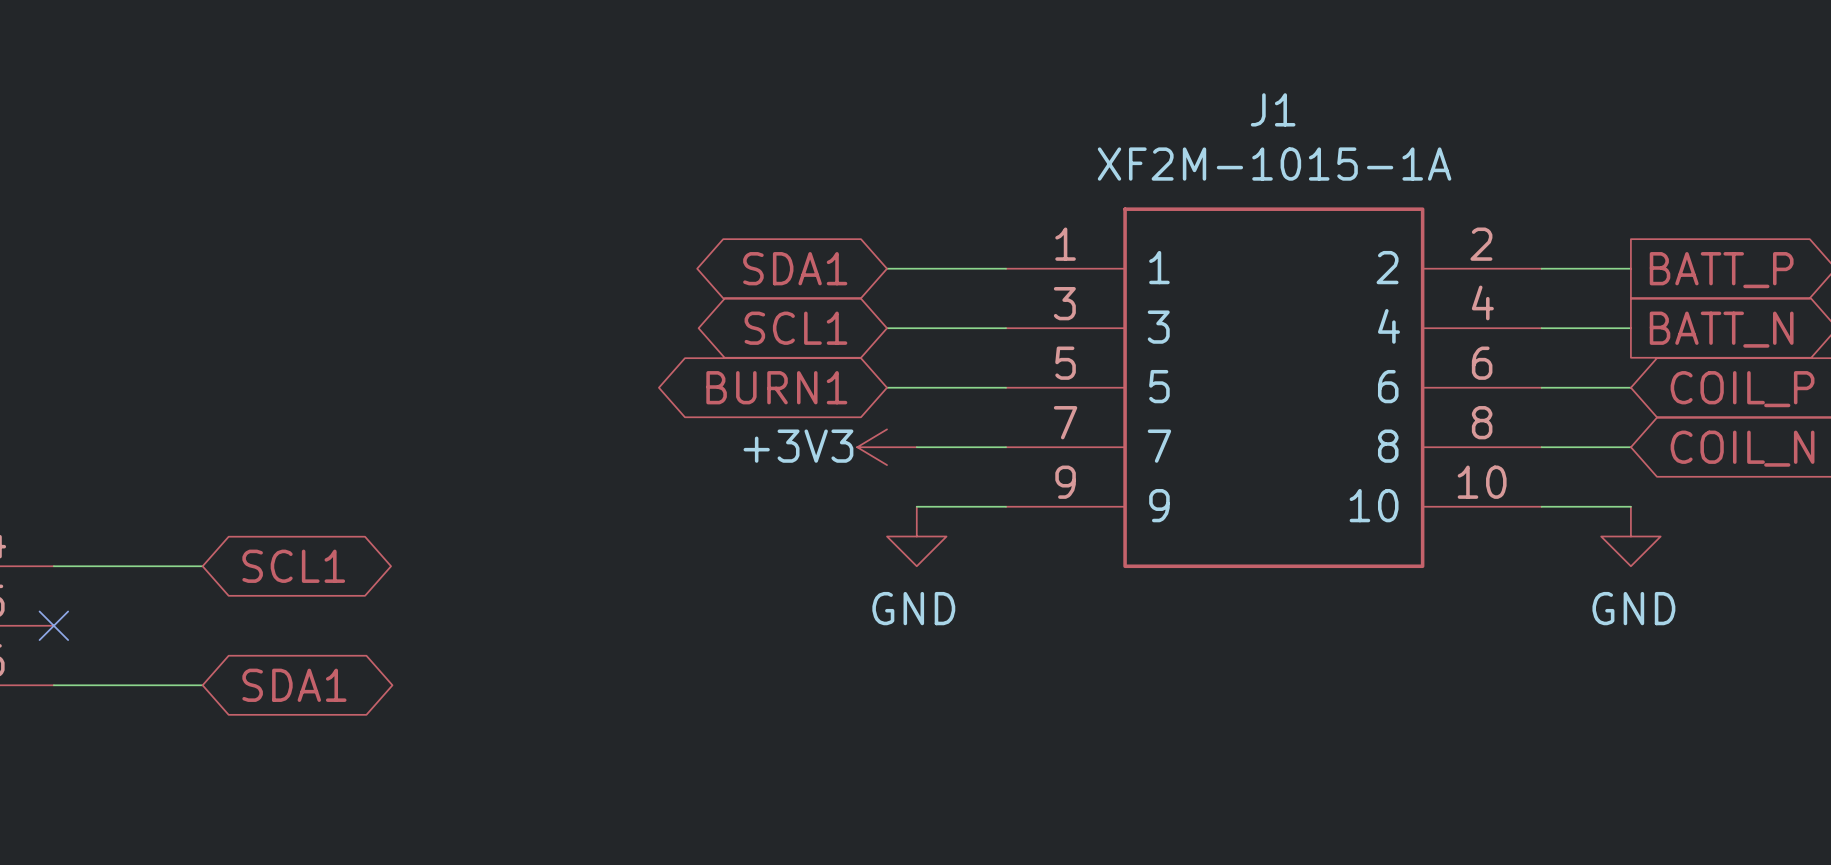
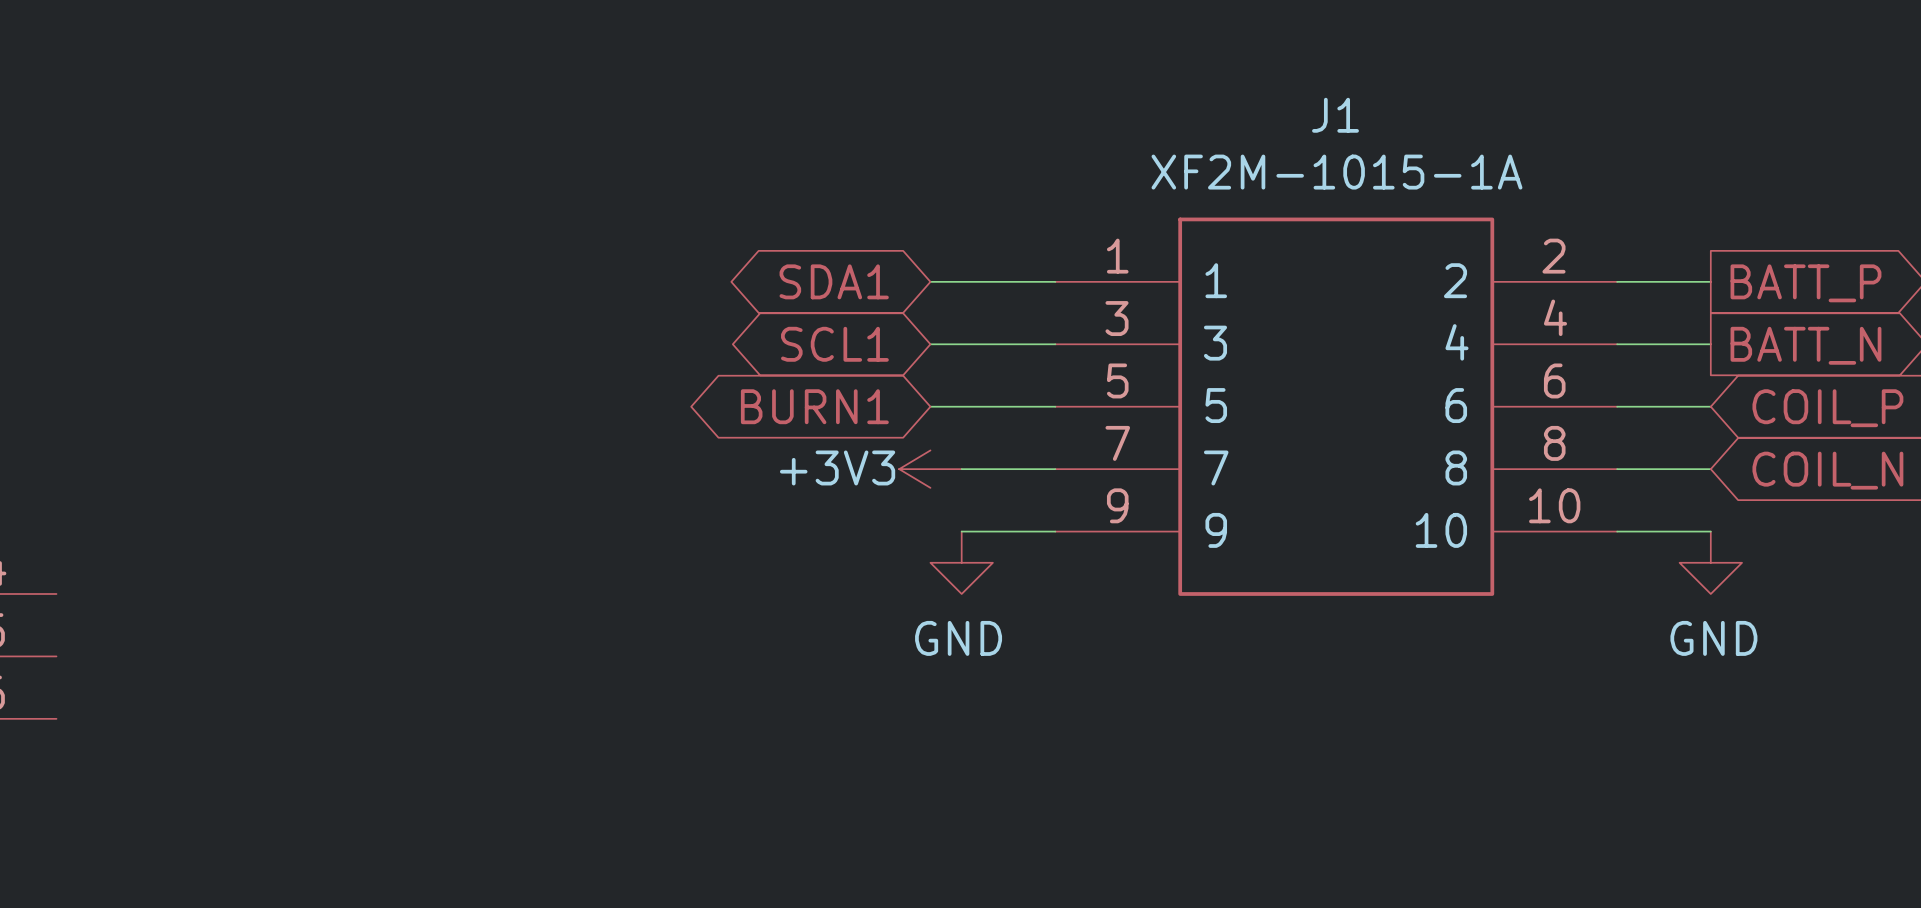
wire: (53, 566) (202, 566) -> none
global label: SCL1 (293, 566) -> none
no-connect mark: (53, 625) -> none
wire: (53, 685) (202, 685) -> none
global label: SDA1 (294, 685) -> none

